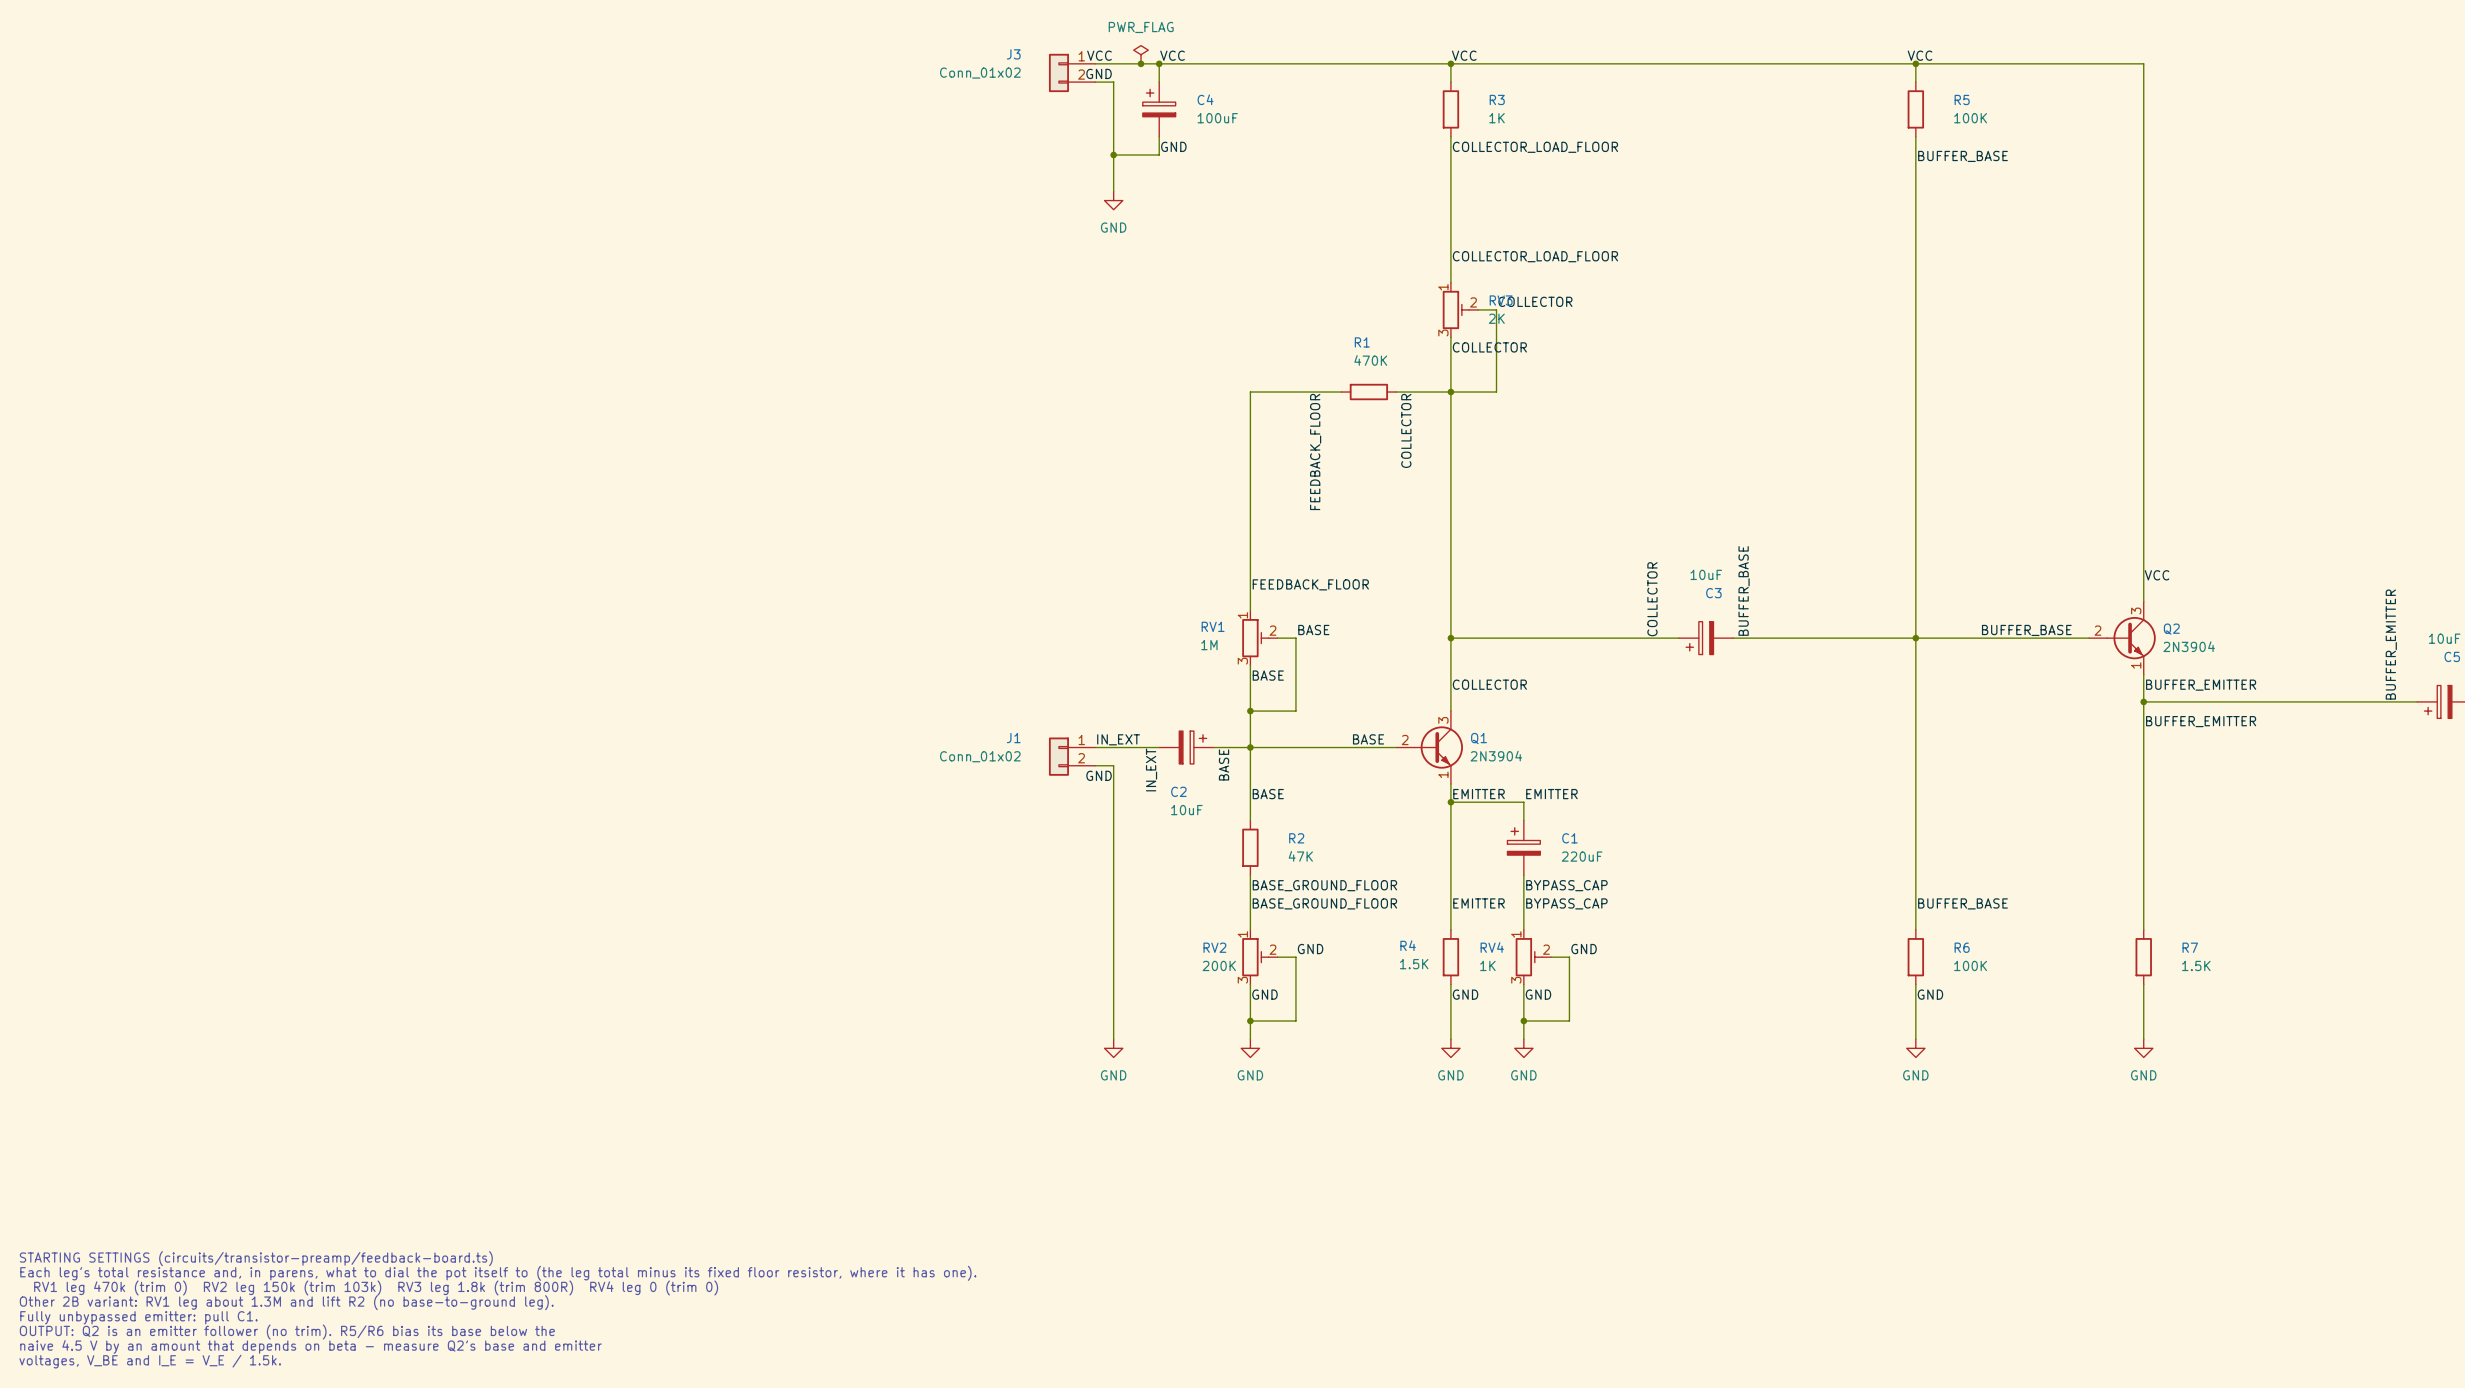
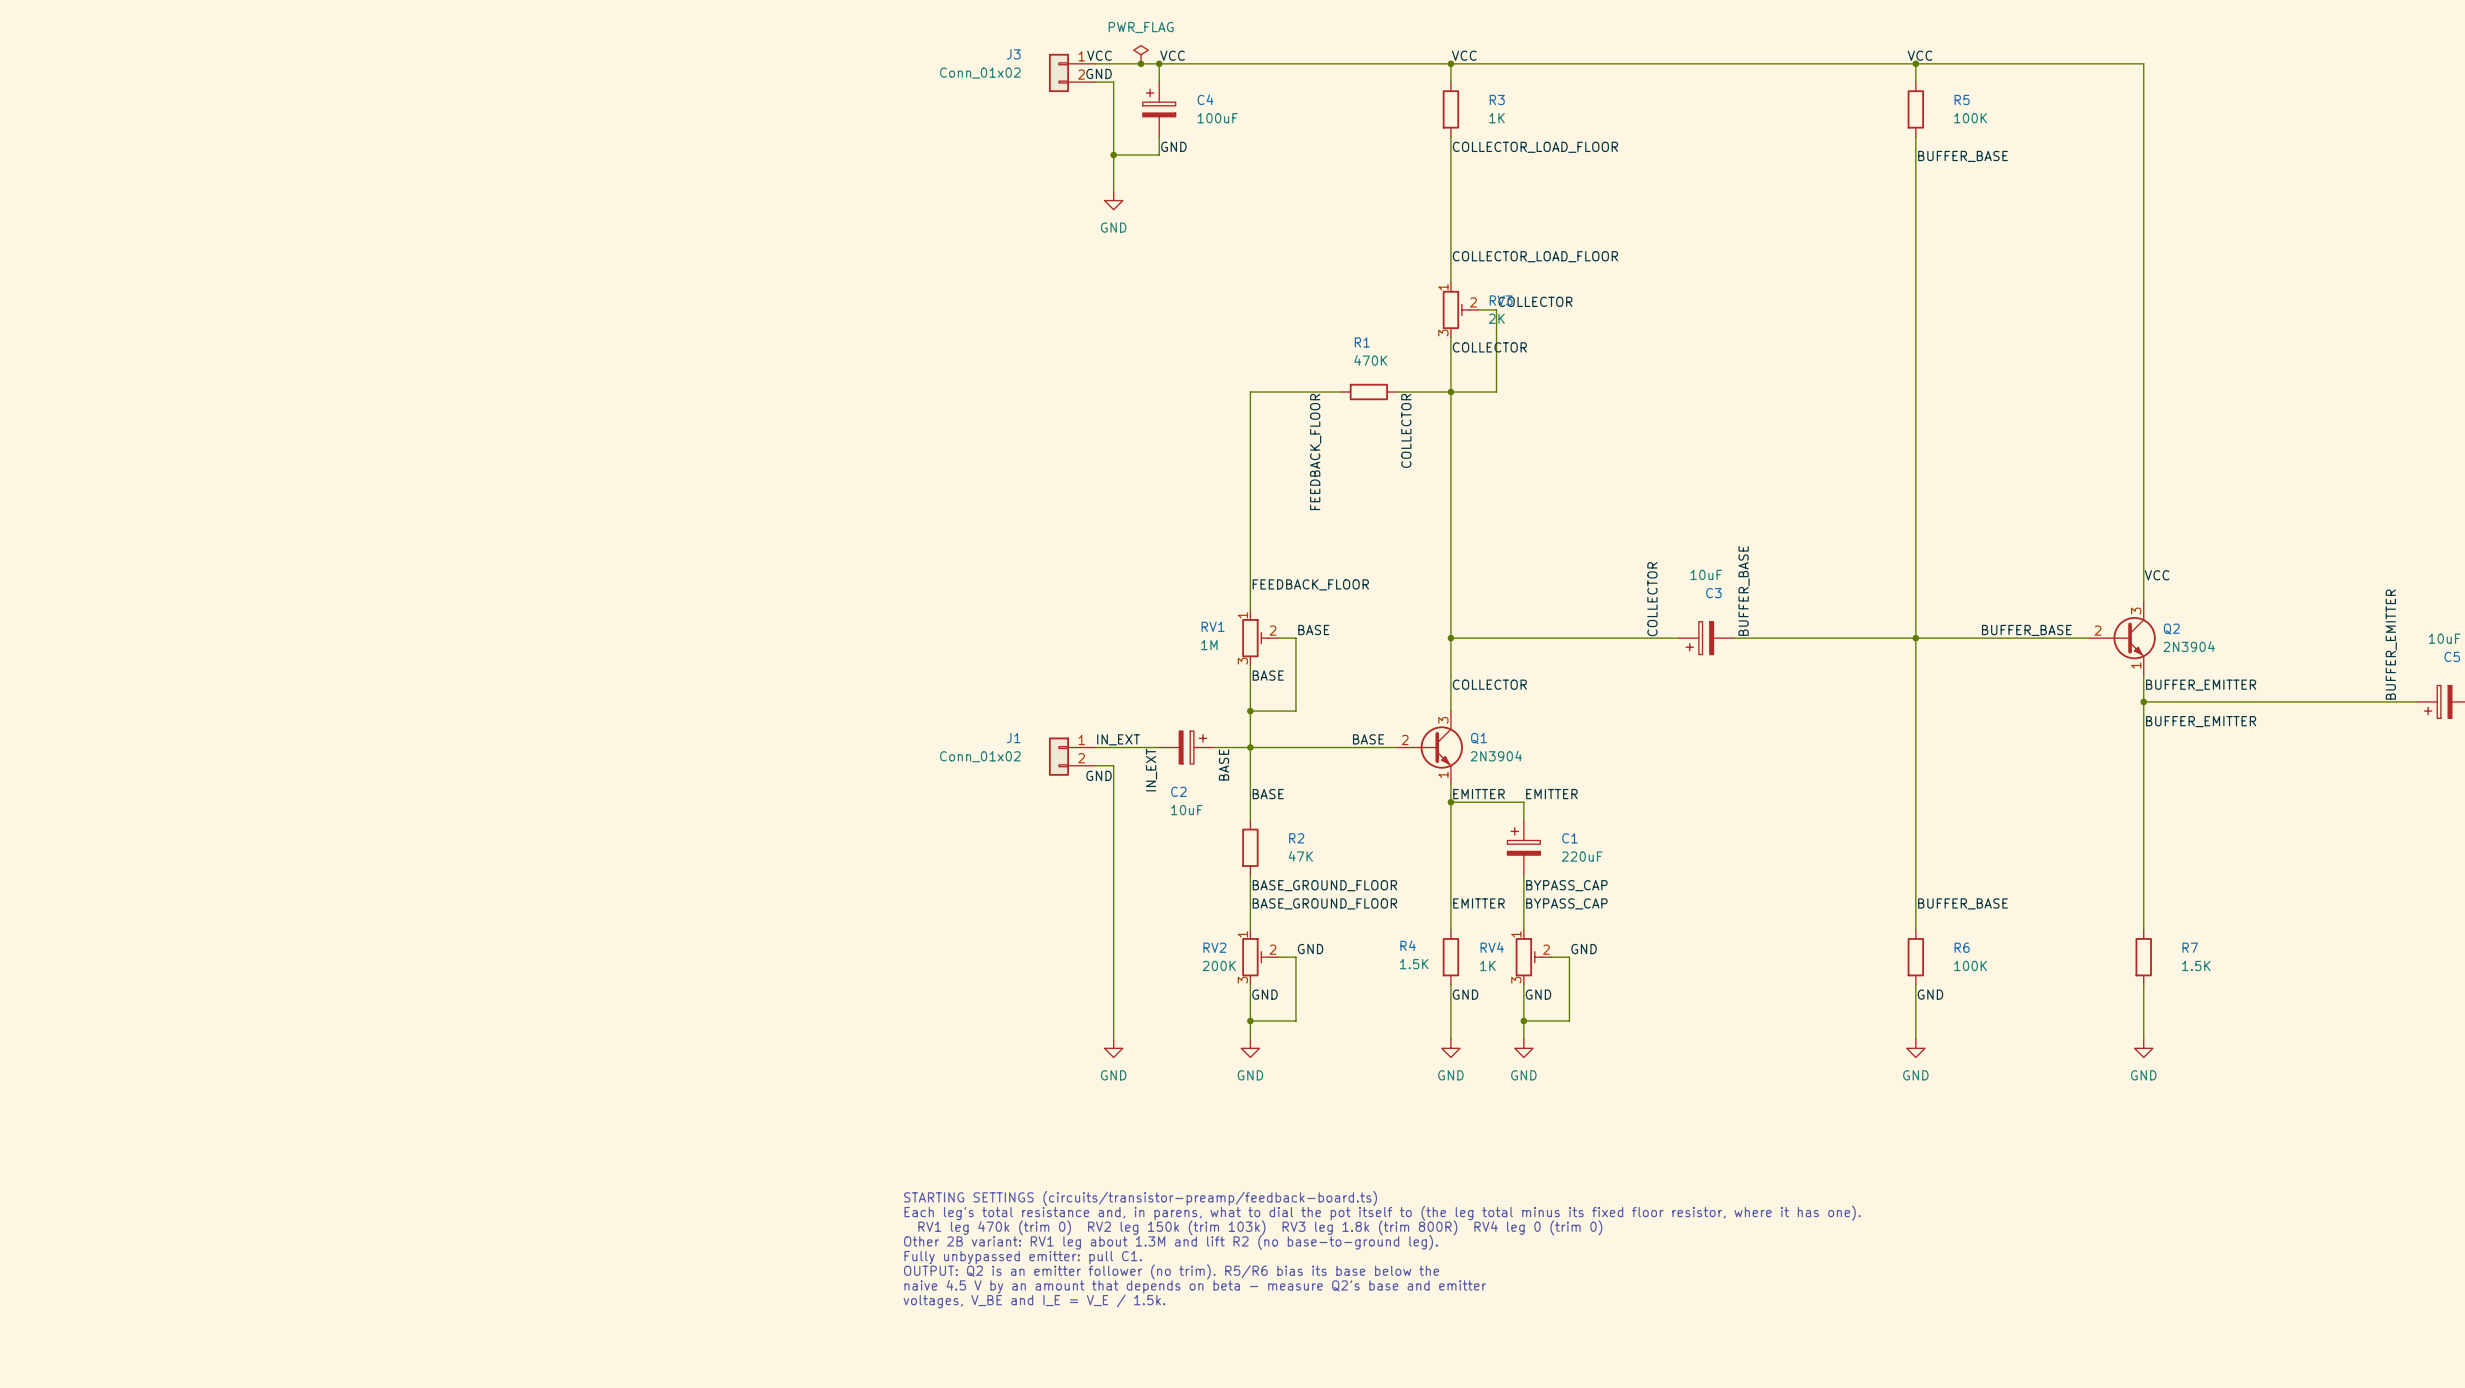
text: none -> STARTING SETTINGS (circuits/transistor-preamp/feedback-board.ts) (1140, 1198)
text: none -> Each leg's total resistance and, in parens, what to dial the pot itself to (the leg total minus its fixed floor resistor, where it has one). (1382, 1213)
text: none -> RV1 leg 470k (trim 0) RV2 leg 150k (trim 103k) RV3 leg 1.8k (trim 800R) RV4 leg 0 (trim 0) (1260, 1227)
text: none -> Other 2B variant: RV1 leg about 1.3M and lift R2 (no base-to-ground leg). (1170, 1242)
text: none -> Fully unbypassed emitter: pull C1. (1023, 1257)
text: STARTING SETTINGS (circuits/transistor-preamp/feedback-board.ts) (256, 1258) -> none
text: none -> OUTPUT: Q2 is an emitter follower (no trim). R5/R6 bias its base below the (1171, 1271)
text: Each leg's total resistance and, in parens, what to dial the pot itself to (the leg total minus its fixed floor resistor, where it has one). (498, 1273) -> none
text: none -> naive 4.5 V by an amount that depends on beta - measure Q2's base and emitter (1195, 1286)
text: RV1 leg 470k (trim 0) RV2 leg 150k (trim 103k) RV3 leg 1.8k (trim 800R) RV4 leg 0 (trim 0) (376, 1287) -> none
text: none -> voltages, V_BE and I_E = V_E / 1.5k. (1034, 1301)
text: Other 2B variant: RV1 leg about 1.3M and lift R2 (no base-to-ground leg). (286, 1302) -> none
text: Fully unbypassed emitter: pull C1. (138, 1317) -> none
text: OUTPUT: Q2 is an emitter follower (no trim). R5/R6 bias its base below the (287, 1332) -> none
text: naive 4.5 V by an amount that depends on beta - measure Q2's base and emitter (311, 1346) -> none
text: voltages, V_BE and I_E = V_E / 1.5k. (150, 1361) -> none

